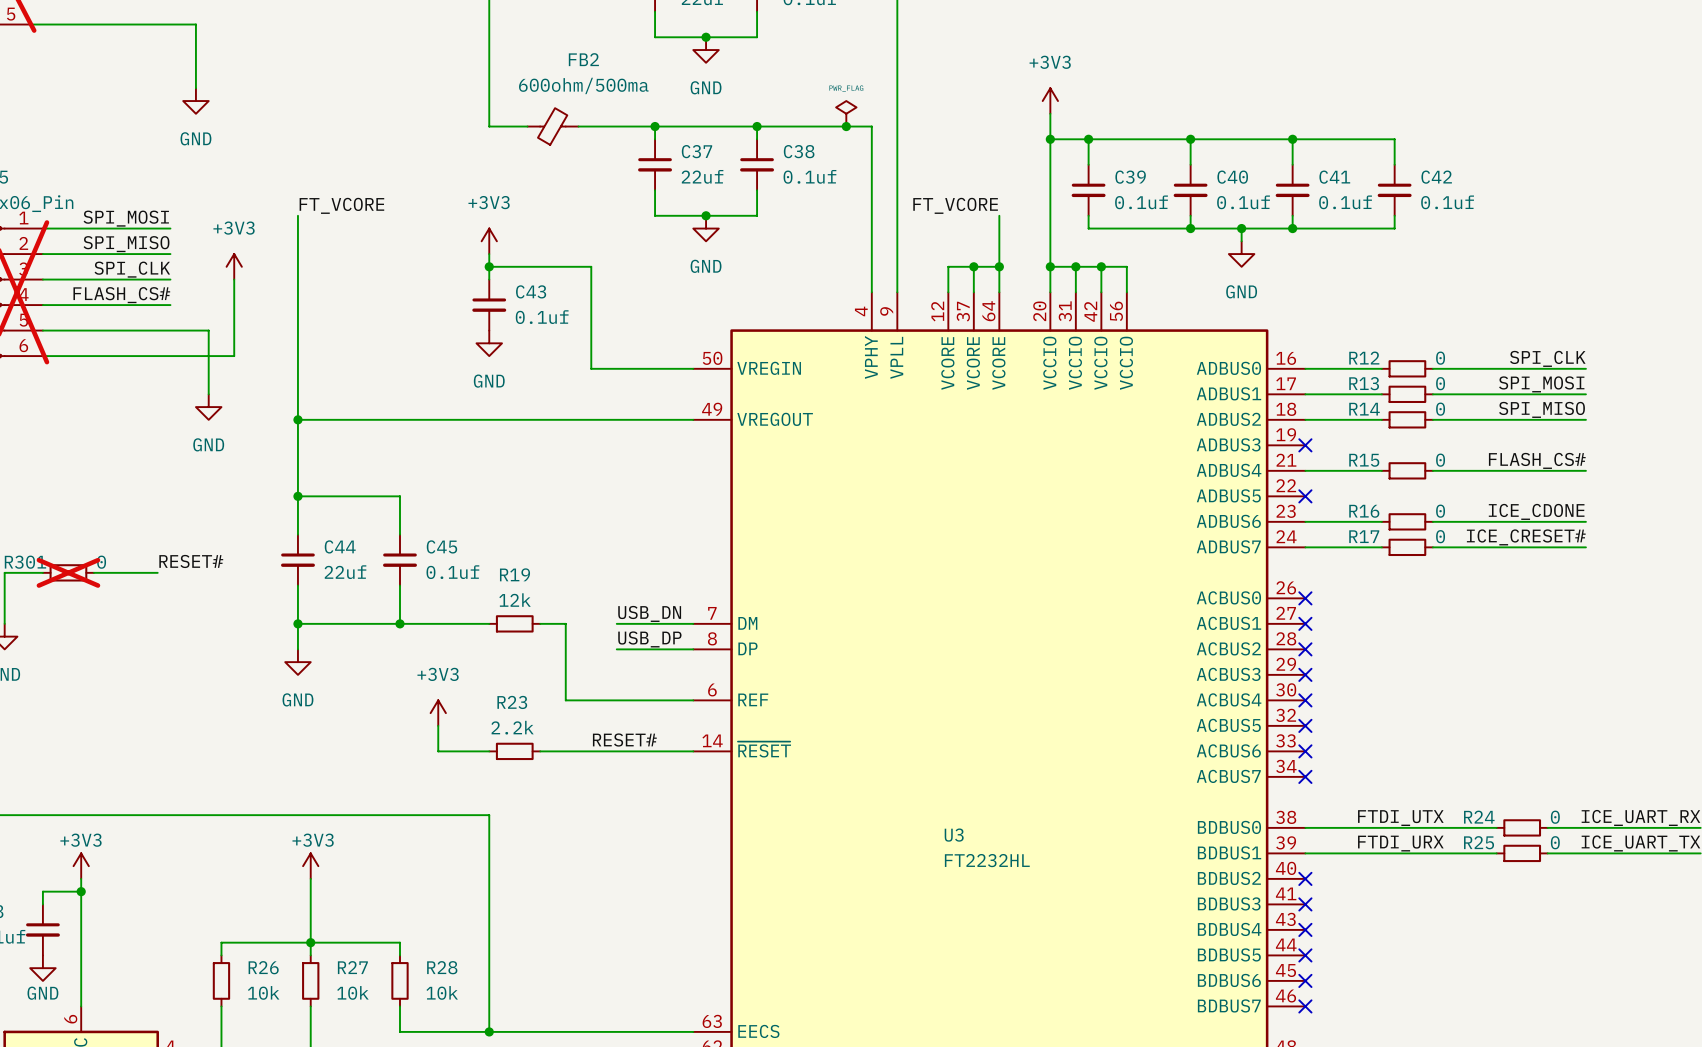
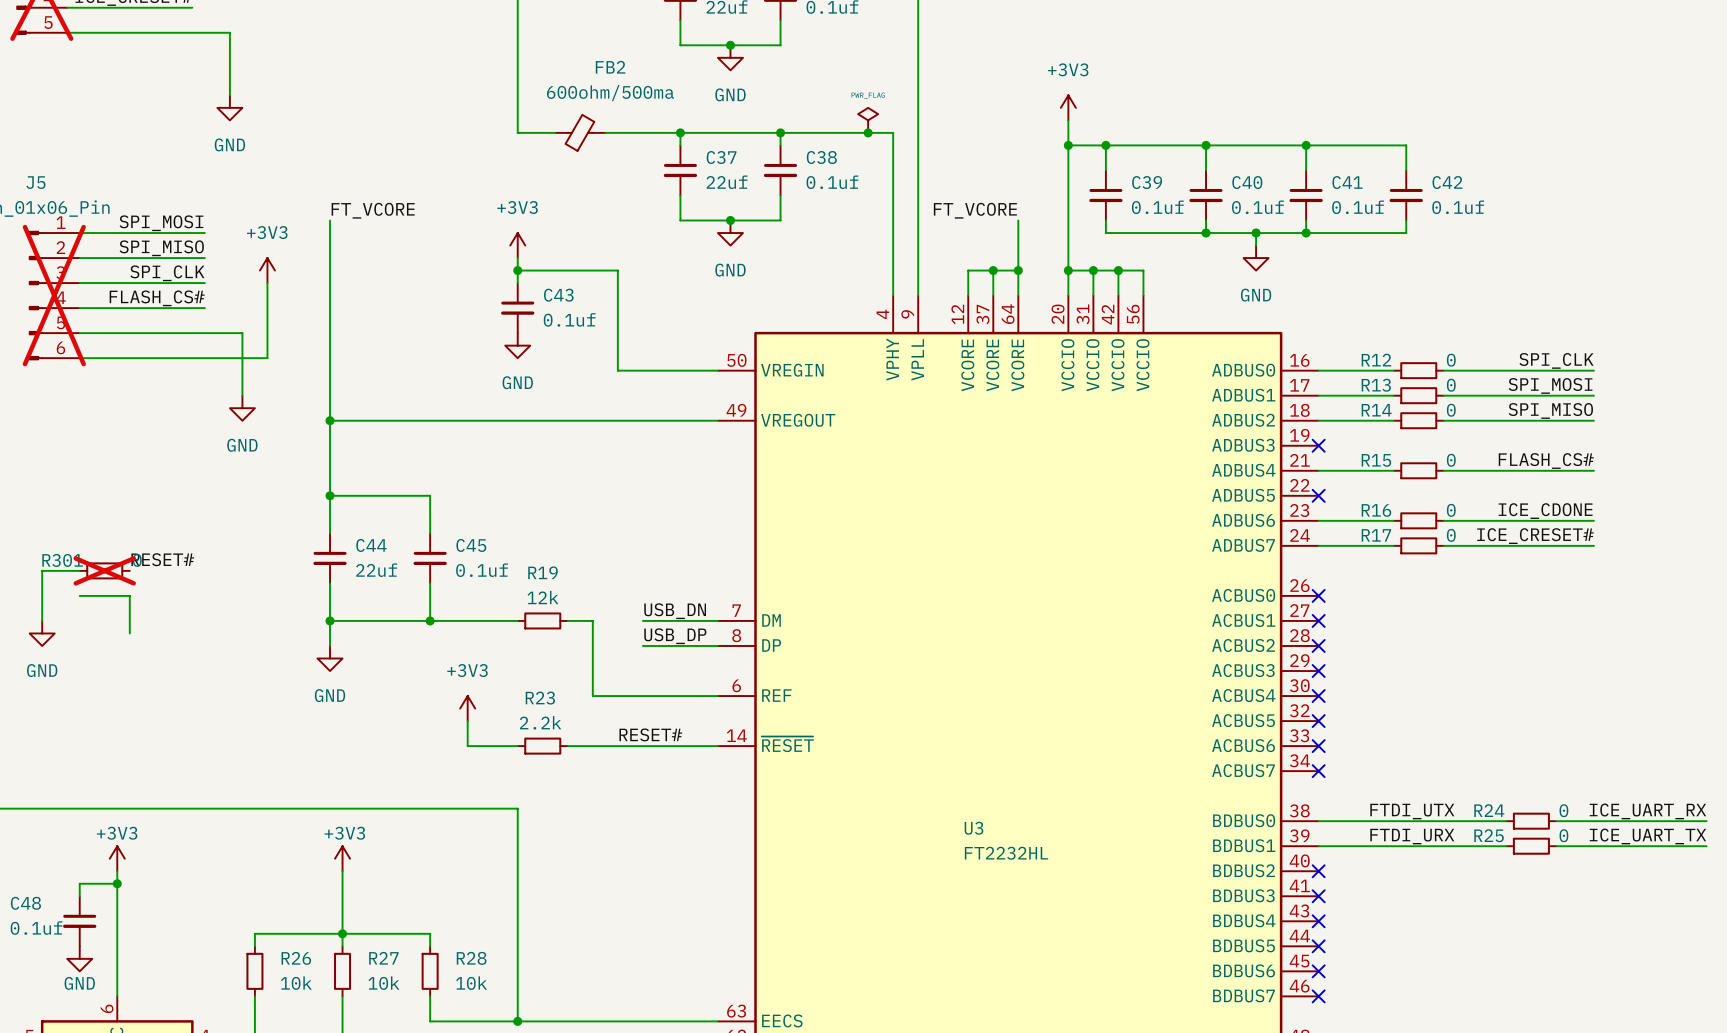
label position: RESET# (191, 561) -> RESET# (162, 559)
wire: (93, 572) (157, 572) -> none
wire: none -> (79, 595) (129, 595) (129, 633)

